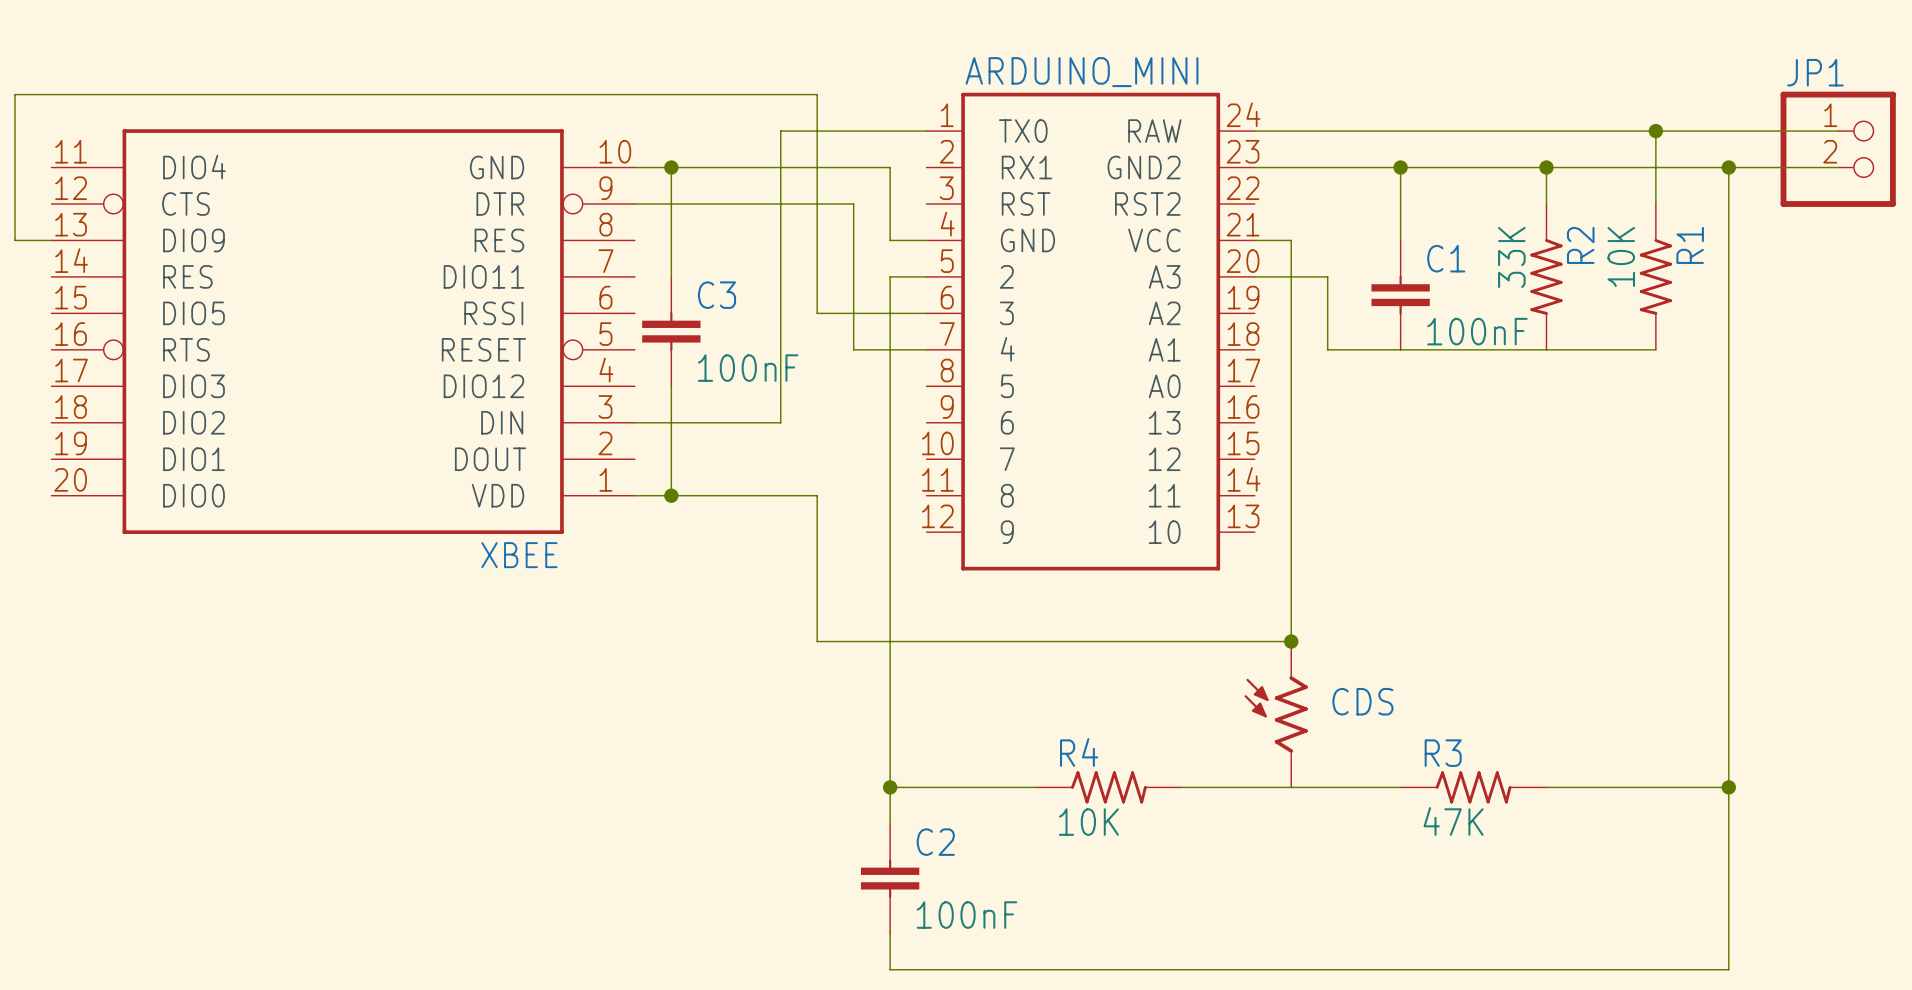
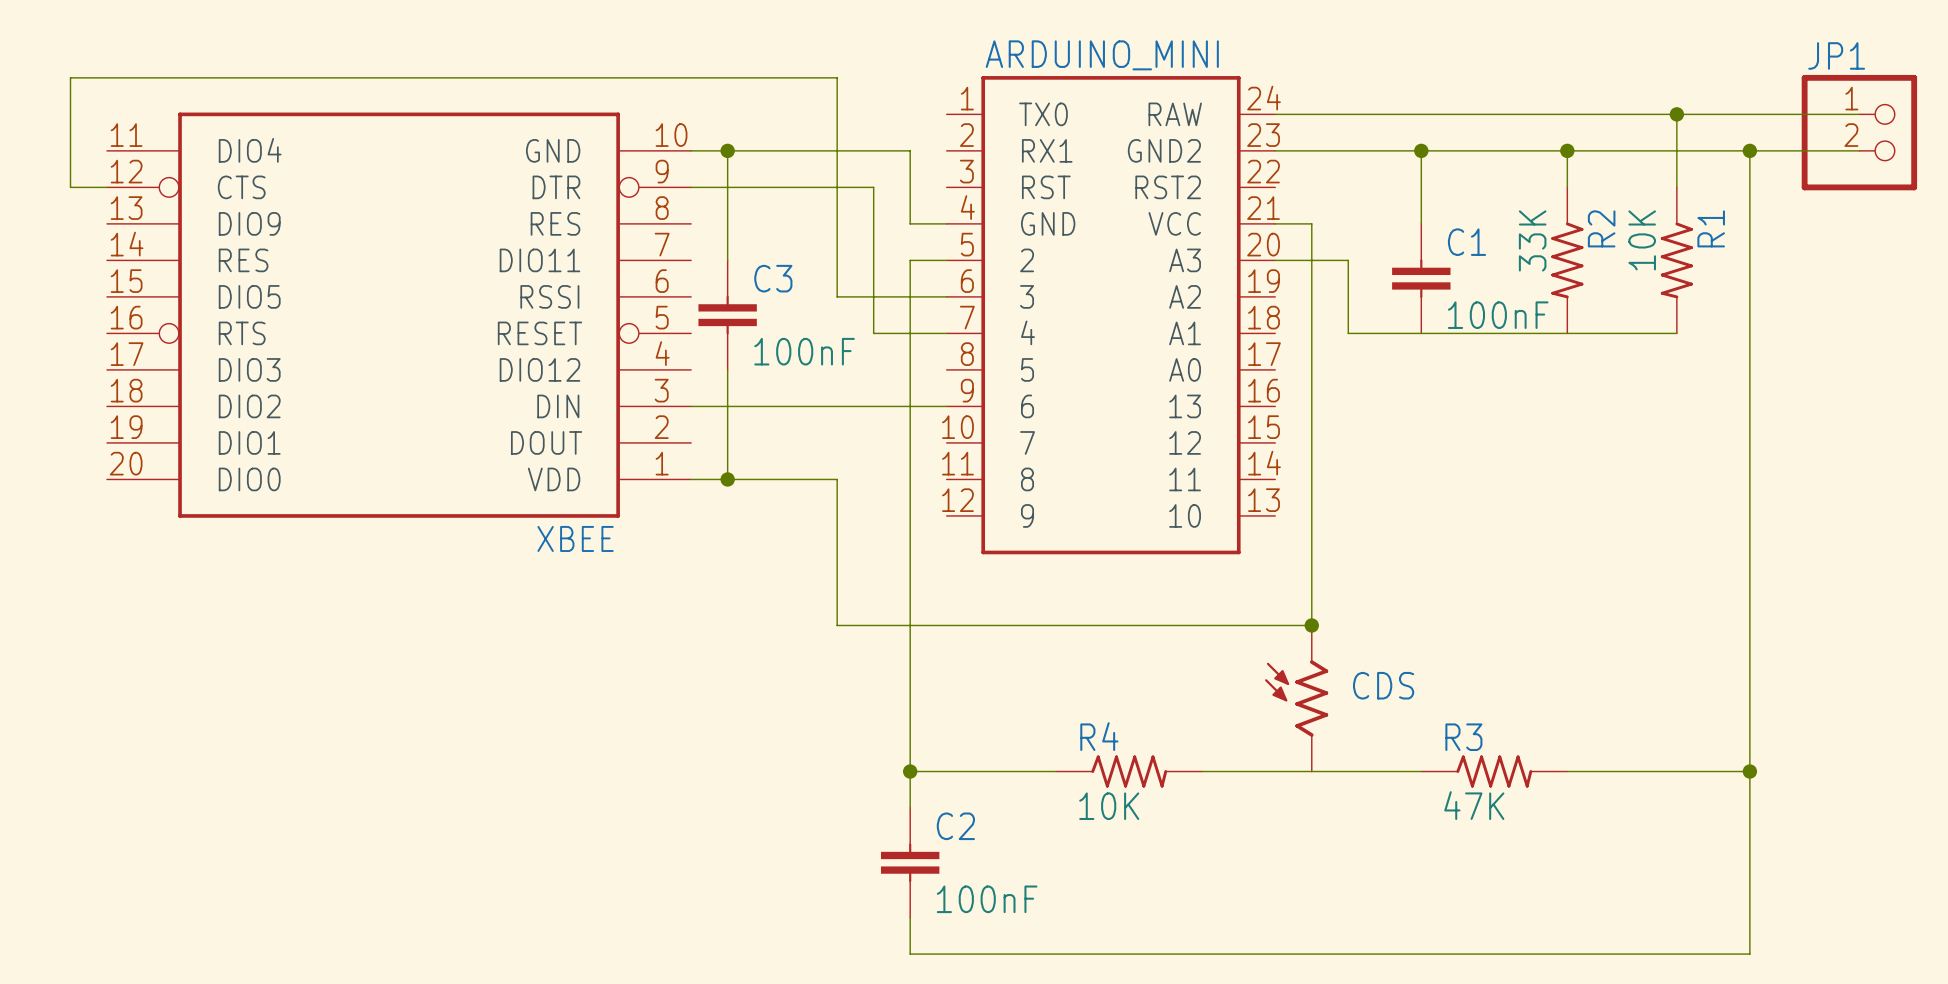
wire: (51, 94) (14, 94) (14, 240) (51, 240) -> (70, 77) (70, 187) (107, 187)
wire: (926, 131) (780, 131) (780, 422) -> (946, 406) (800, 406)
wire: (634, 167) (671, 167) (671, 276) -> none
junction position: (671, 167) -> (727, 150)
wire: none -> (727, 150) (727, 260)
XBEE position: (343, 331) -> (399, 315)
C3 position: (671, 331) -> (727, 315)
wire: (671, 386) (671, 495) (634, 495) -> none
wire: none -> (727, 369) (727, 479)
junction position: (671, 495) -> (727, 479)

